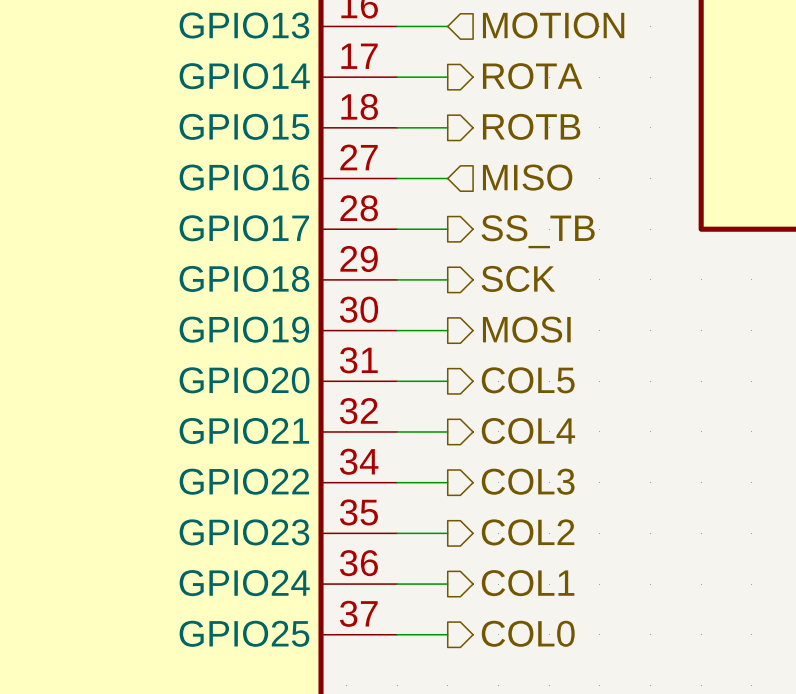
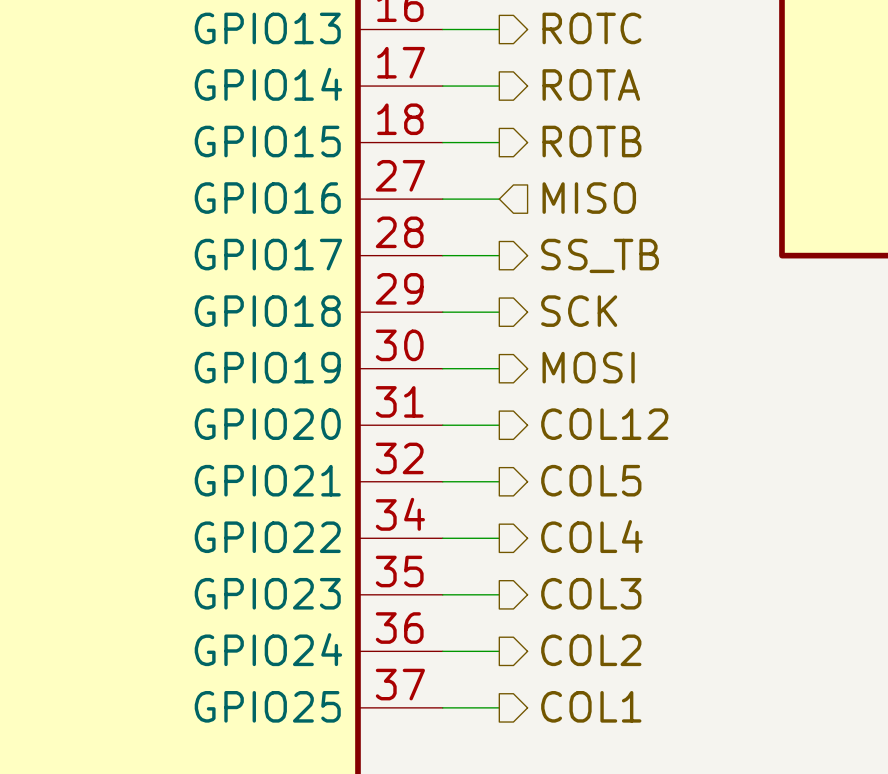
hierarchical label shape: input (553, 25) -> output (591, 28)
hierarchical label: MOTION (553, 25) -> ROTC (591, 28)
hierarchical label: COL5 (528, 380) -> COL12 (604, 424)
hierarchical label: COL4 (528, 431) -> COL5 (591, 480)
hierarchical label: COL3 (528, 481) -> COL4 (591, 536)
hierarchical label: COL2 (528, 532) -> COL3 (591, 593)
hierarchical label: COL1 (528, 583) -> COL2 (591, 650)
hierarchical label: COL0 (528, 633) -> COL1 (591, 706)

